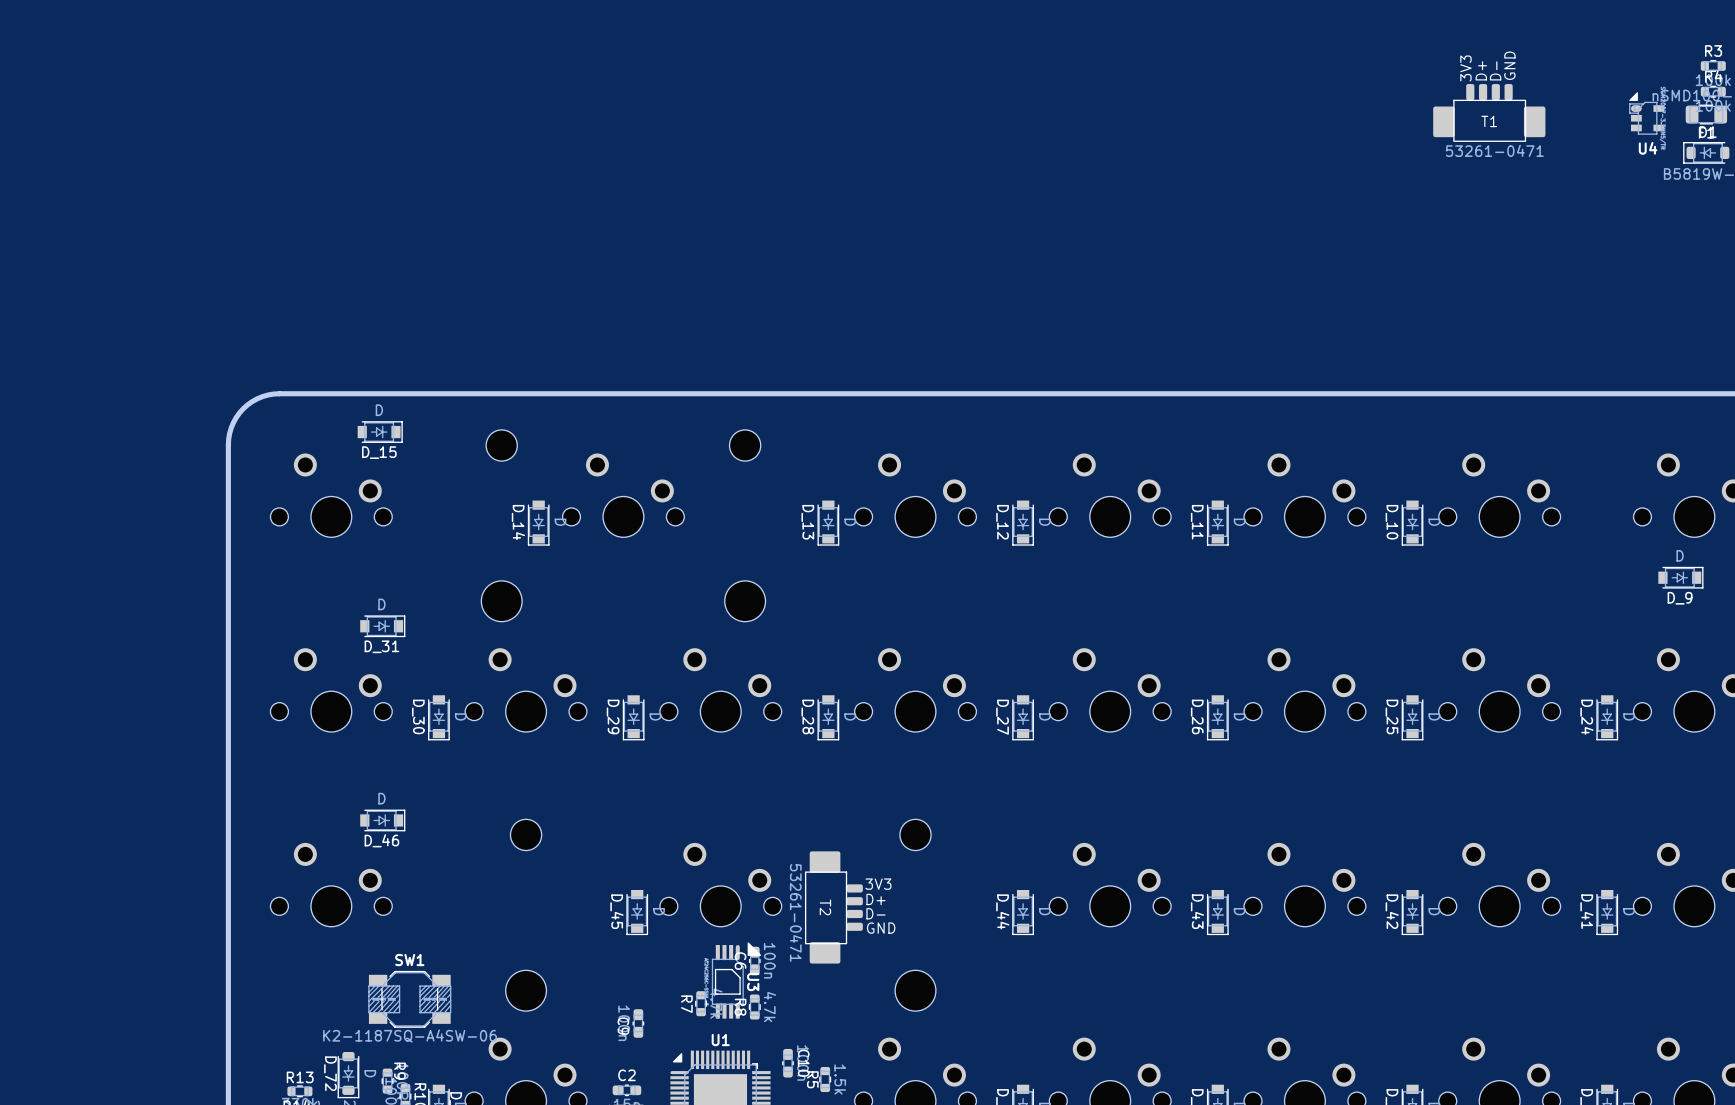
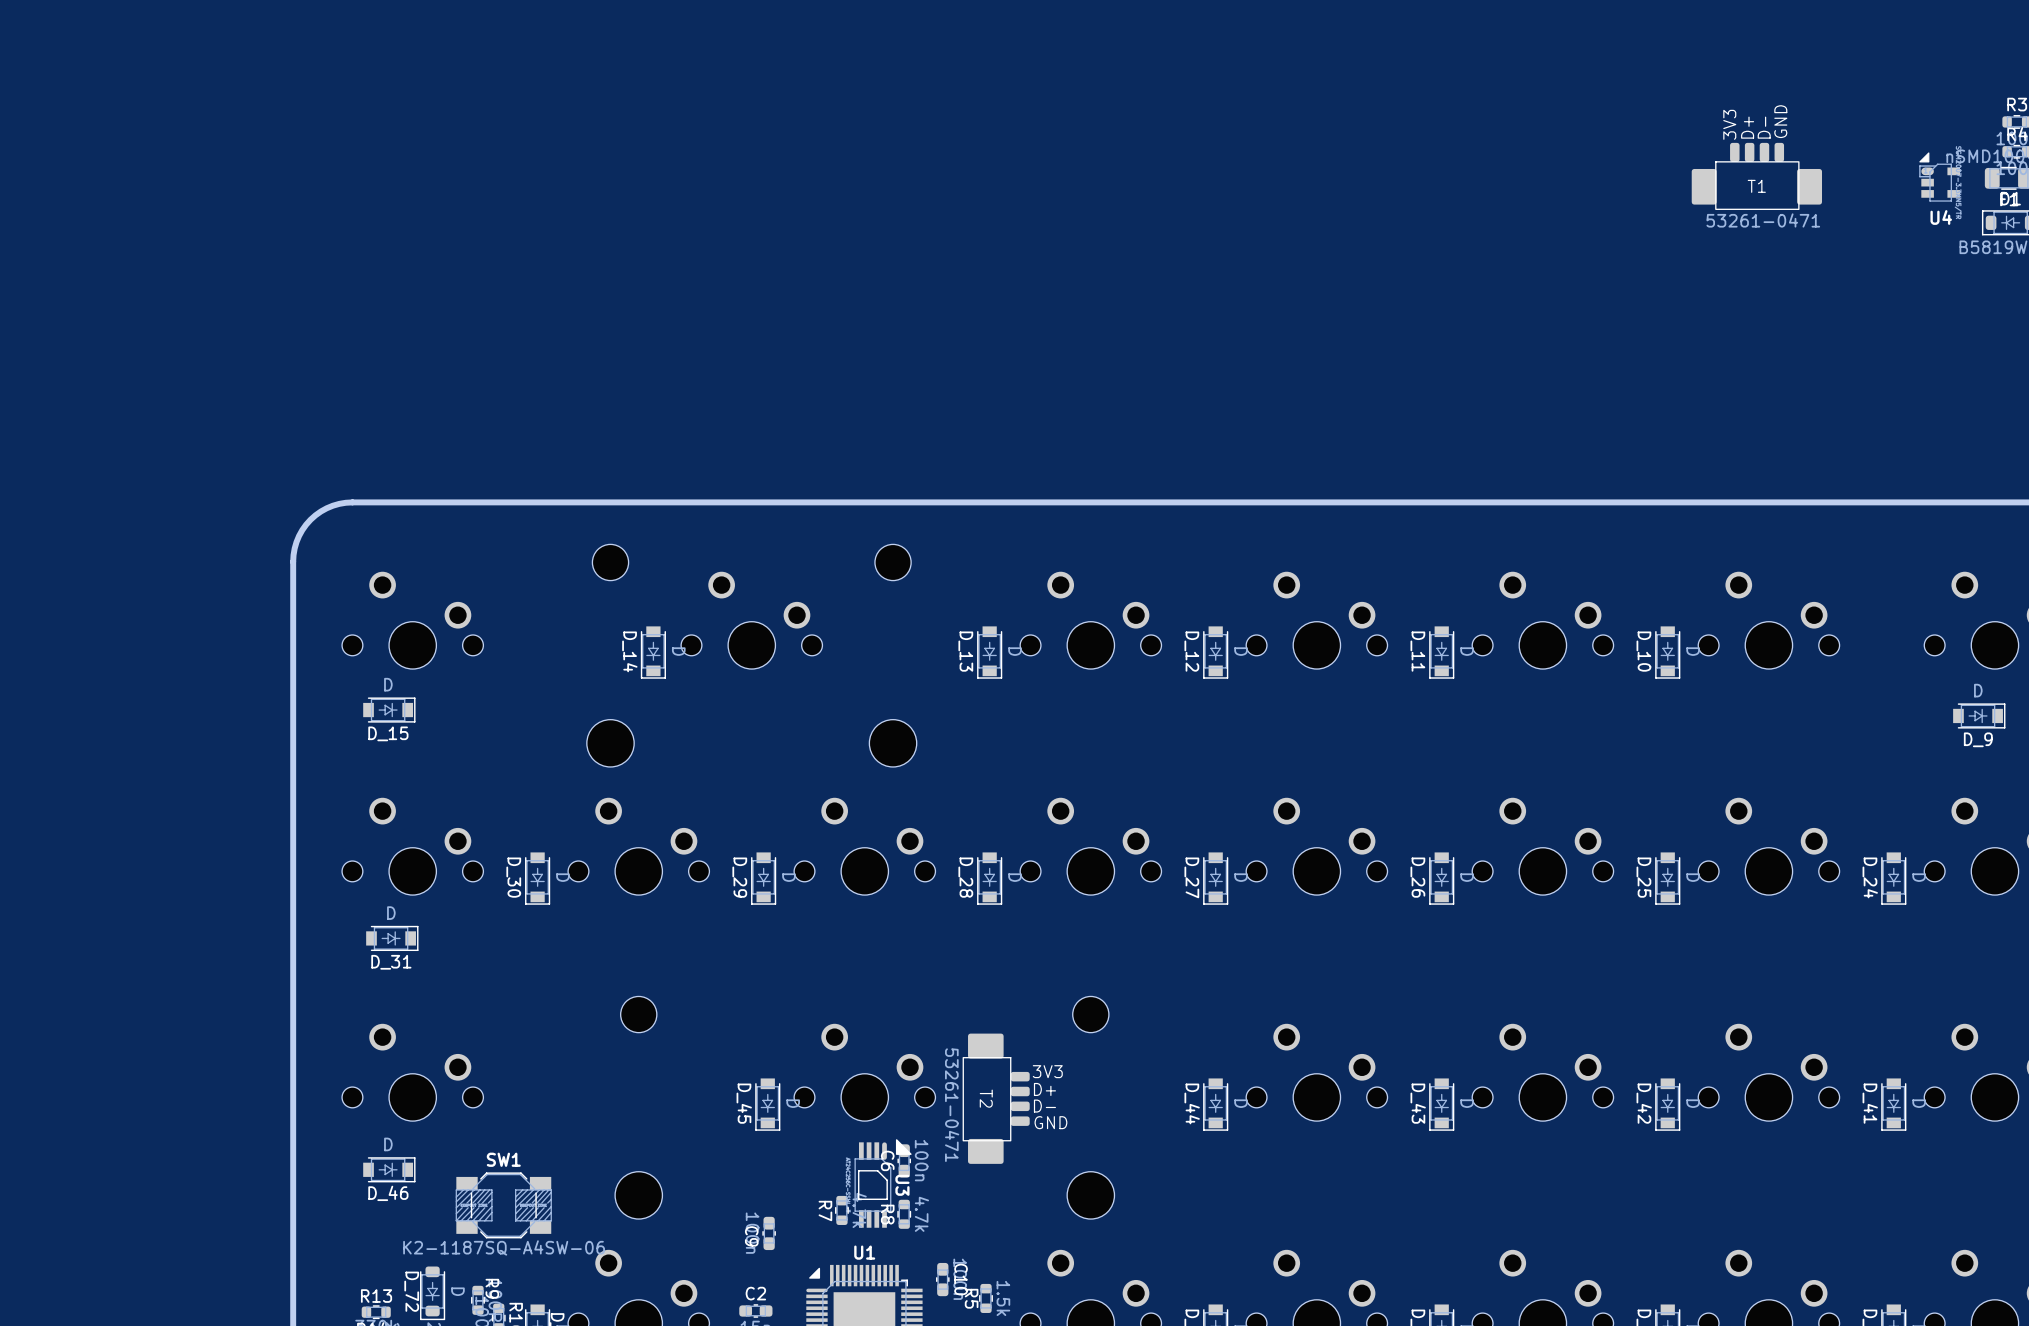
D_15 position: (380, 432) -> (389, 710)
D_31 position: (382, 626) -> (392, 938)
D_46 position: (382, 820) -> (389, 1169)

